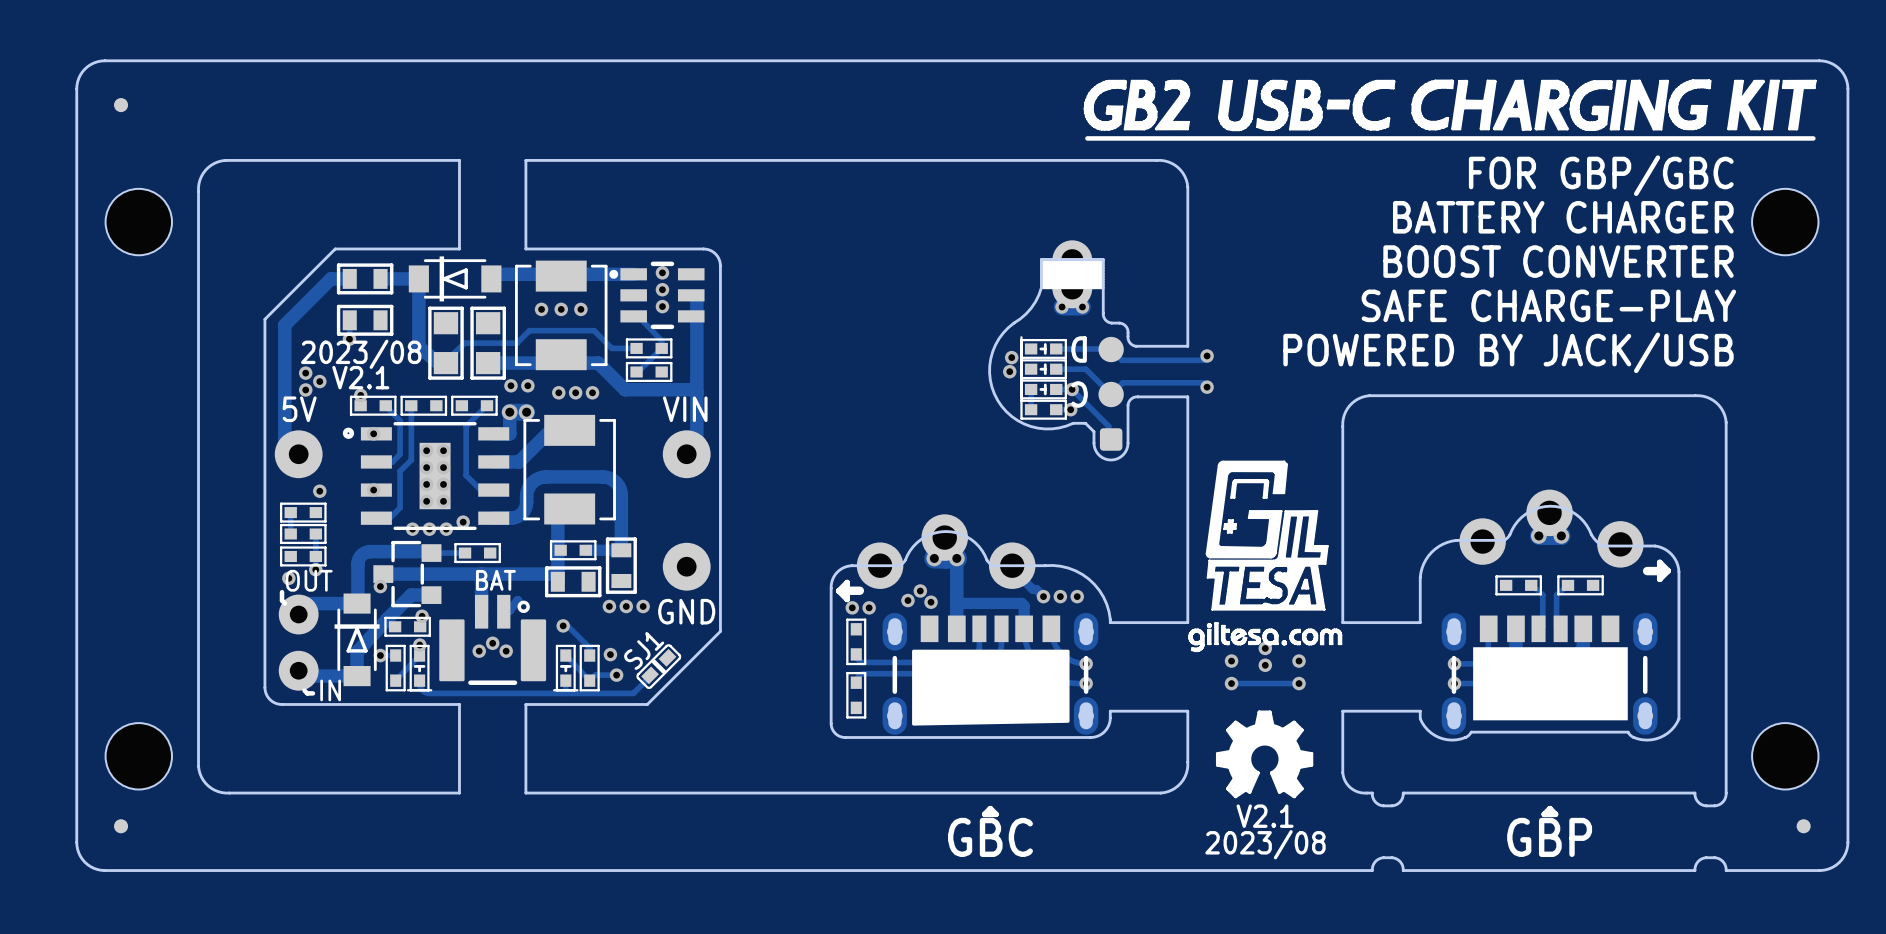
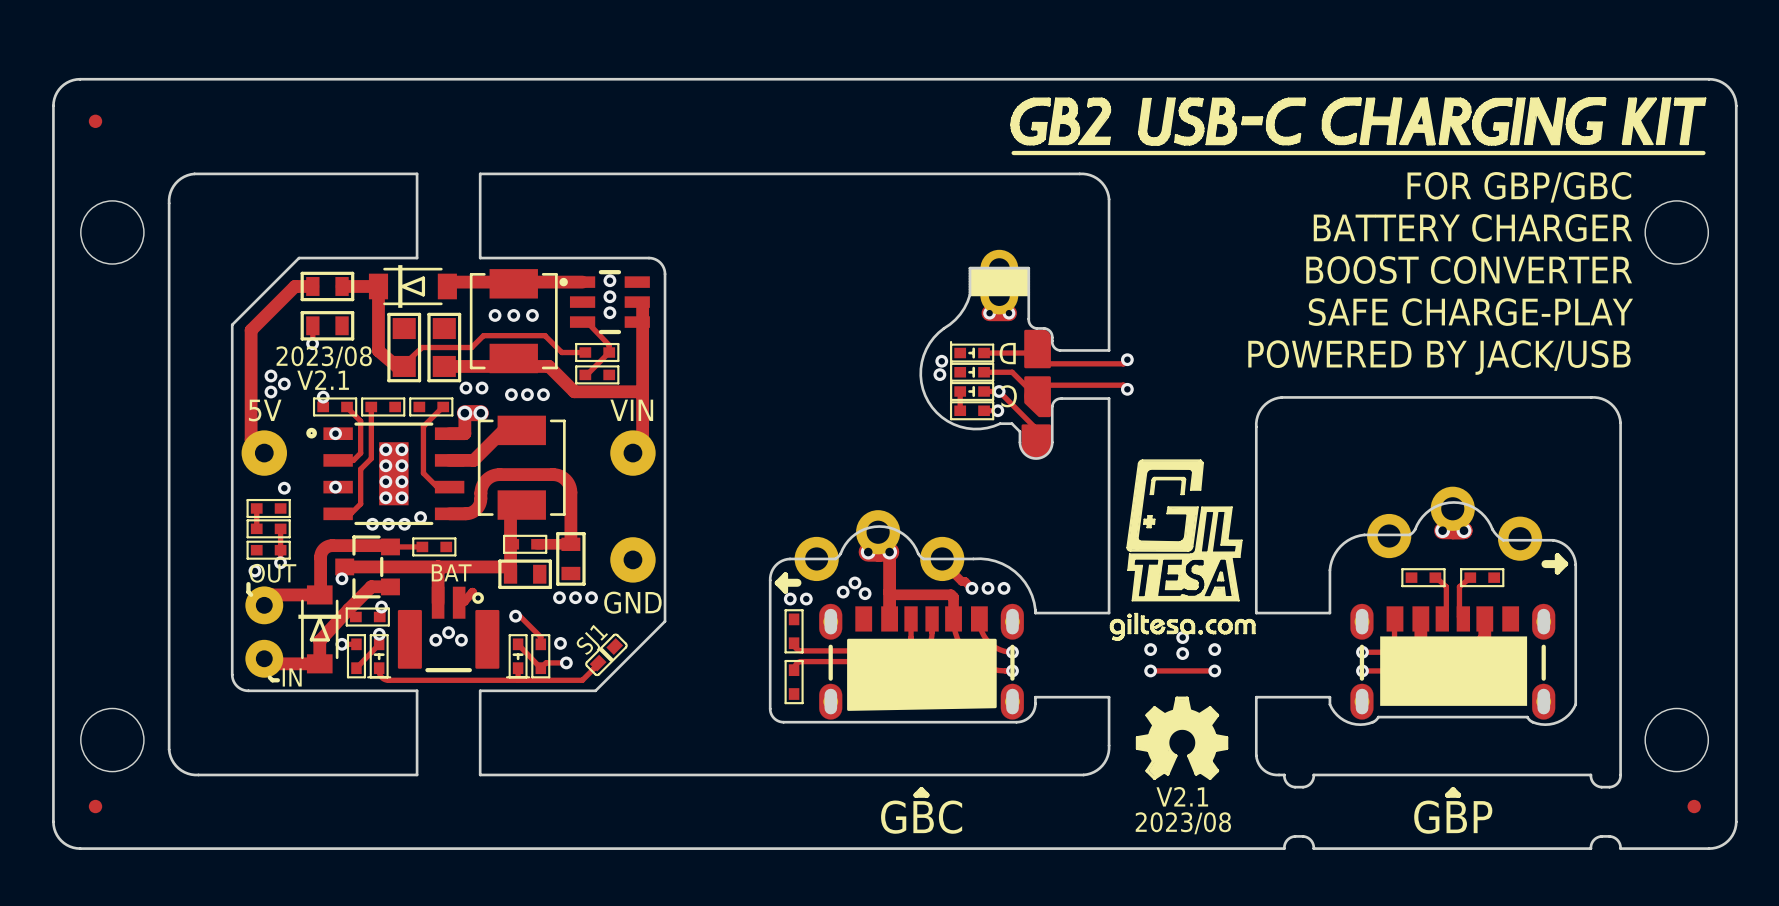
part footprint: [1052, 240, 1124, 451] -> [980, 249, 1051, 458]

